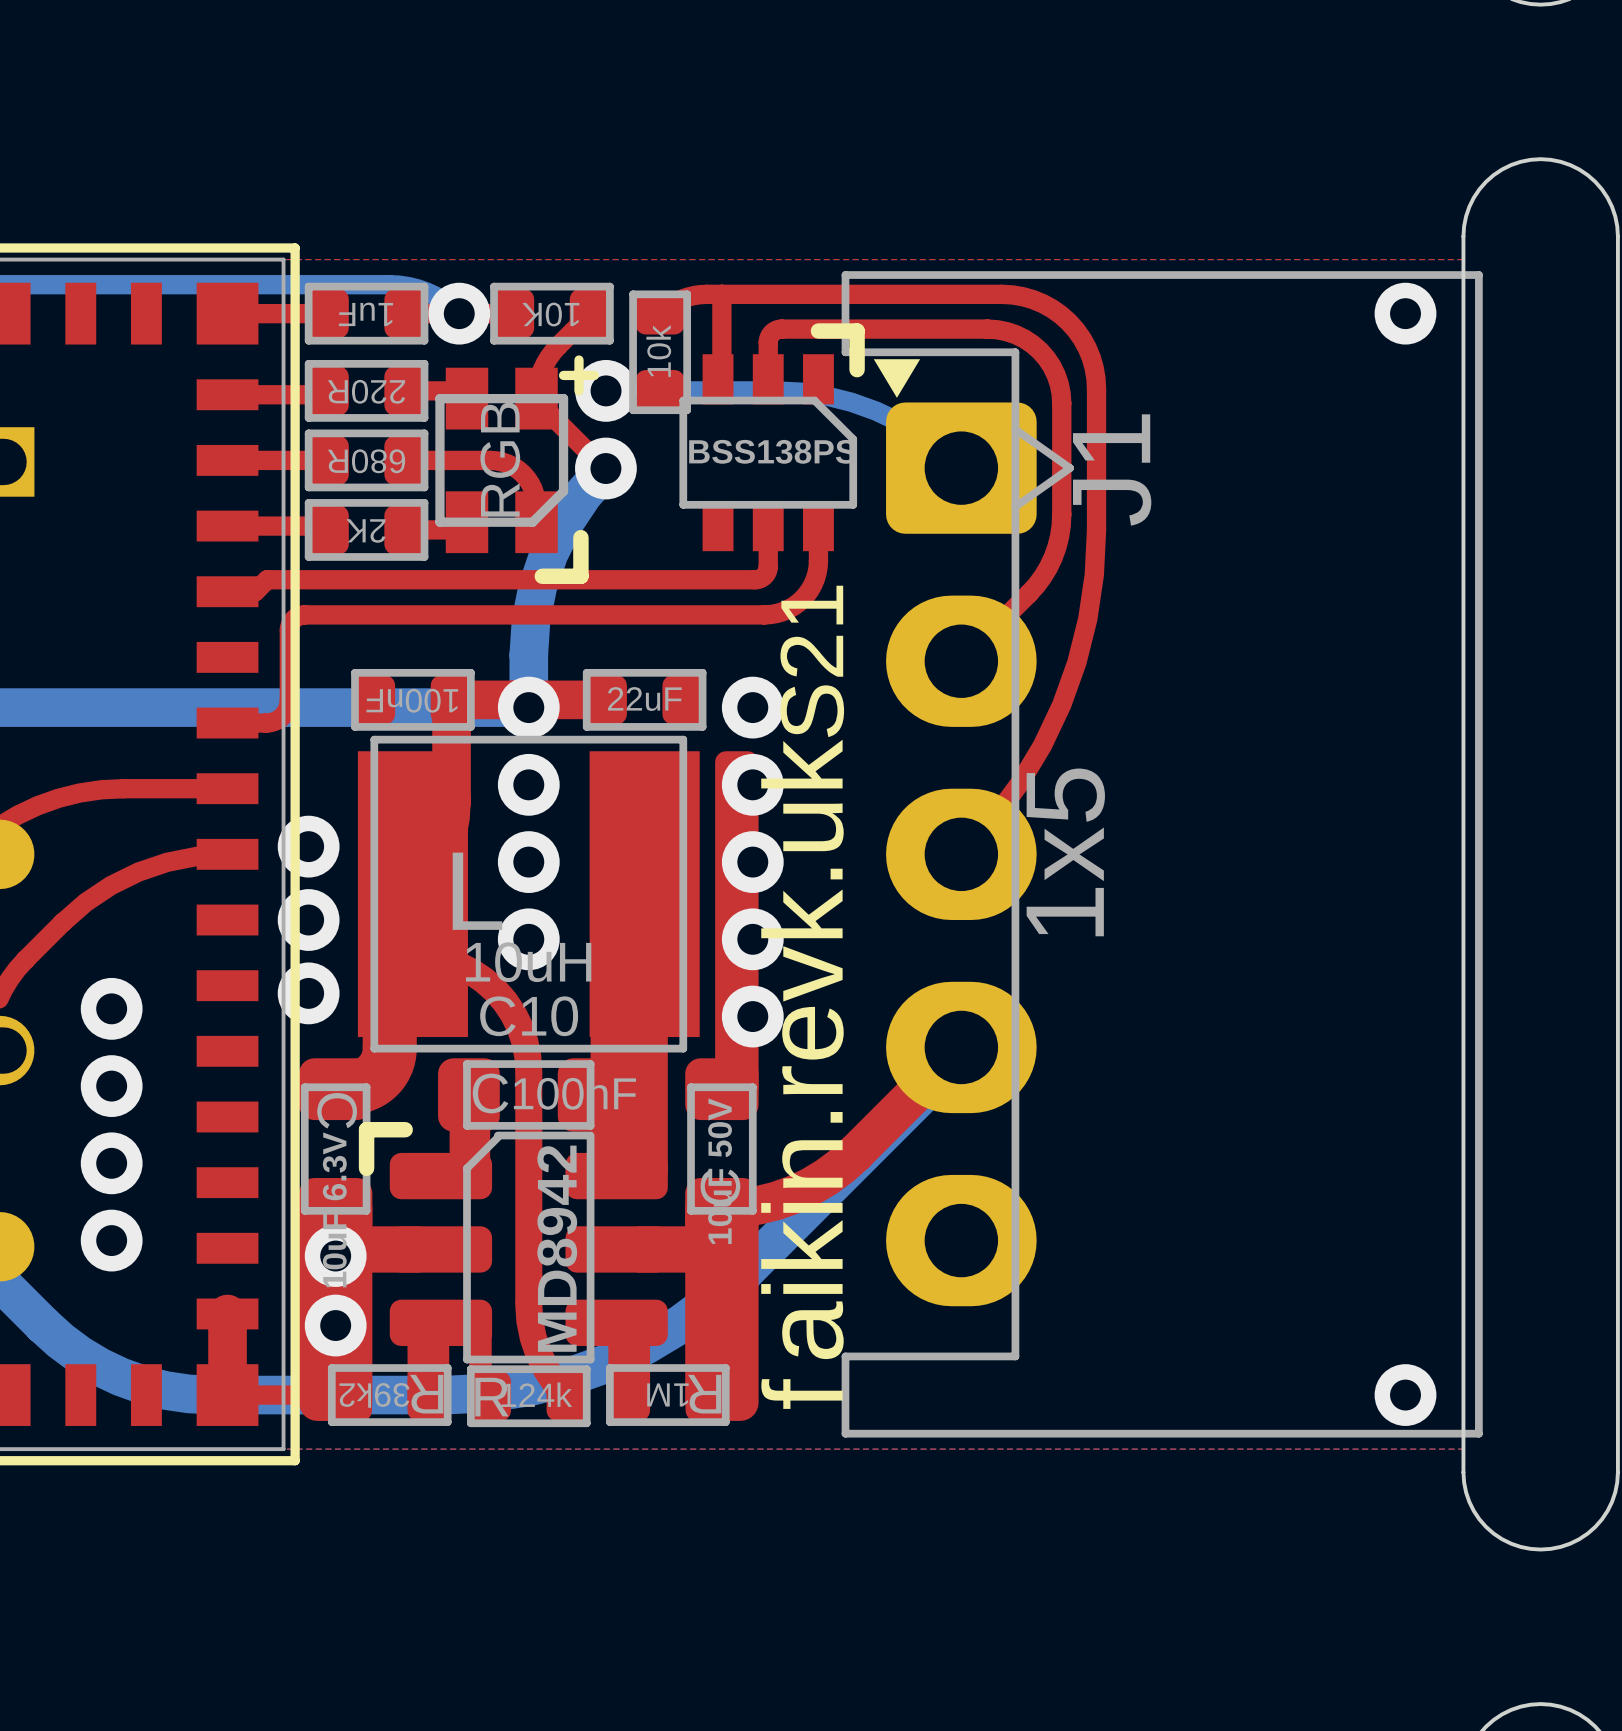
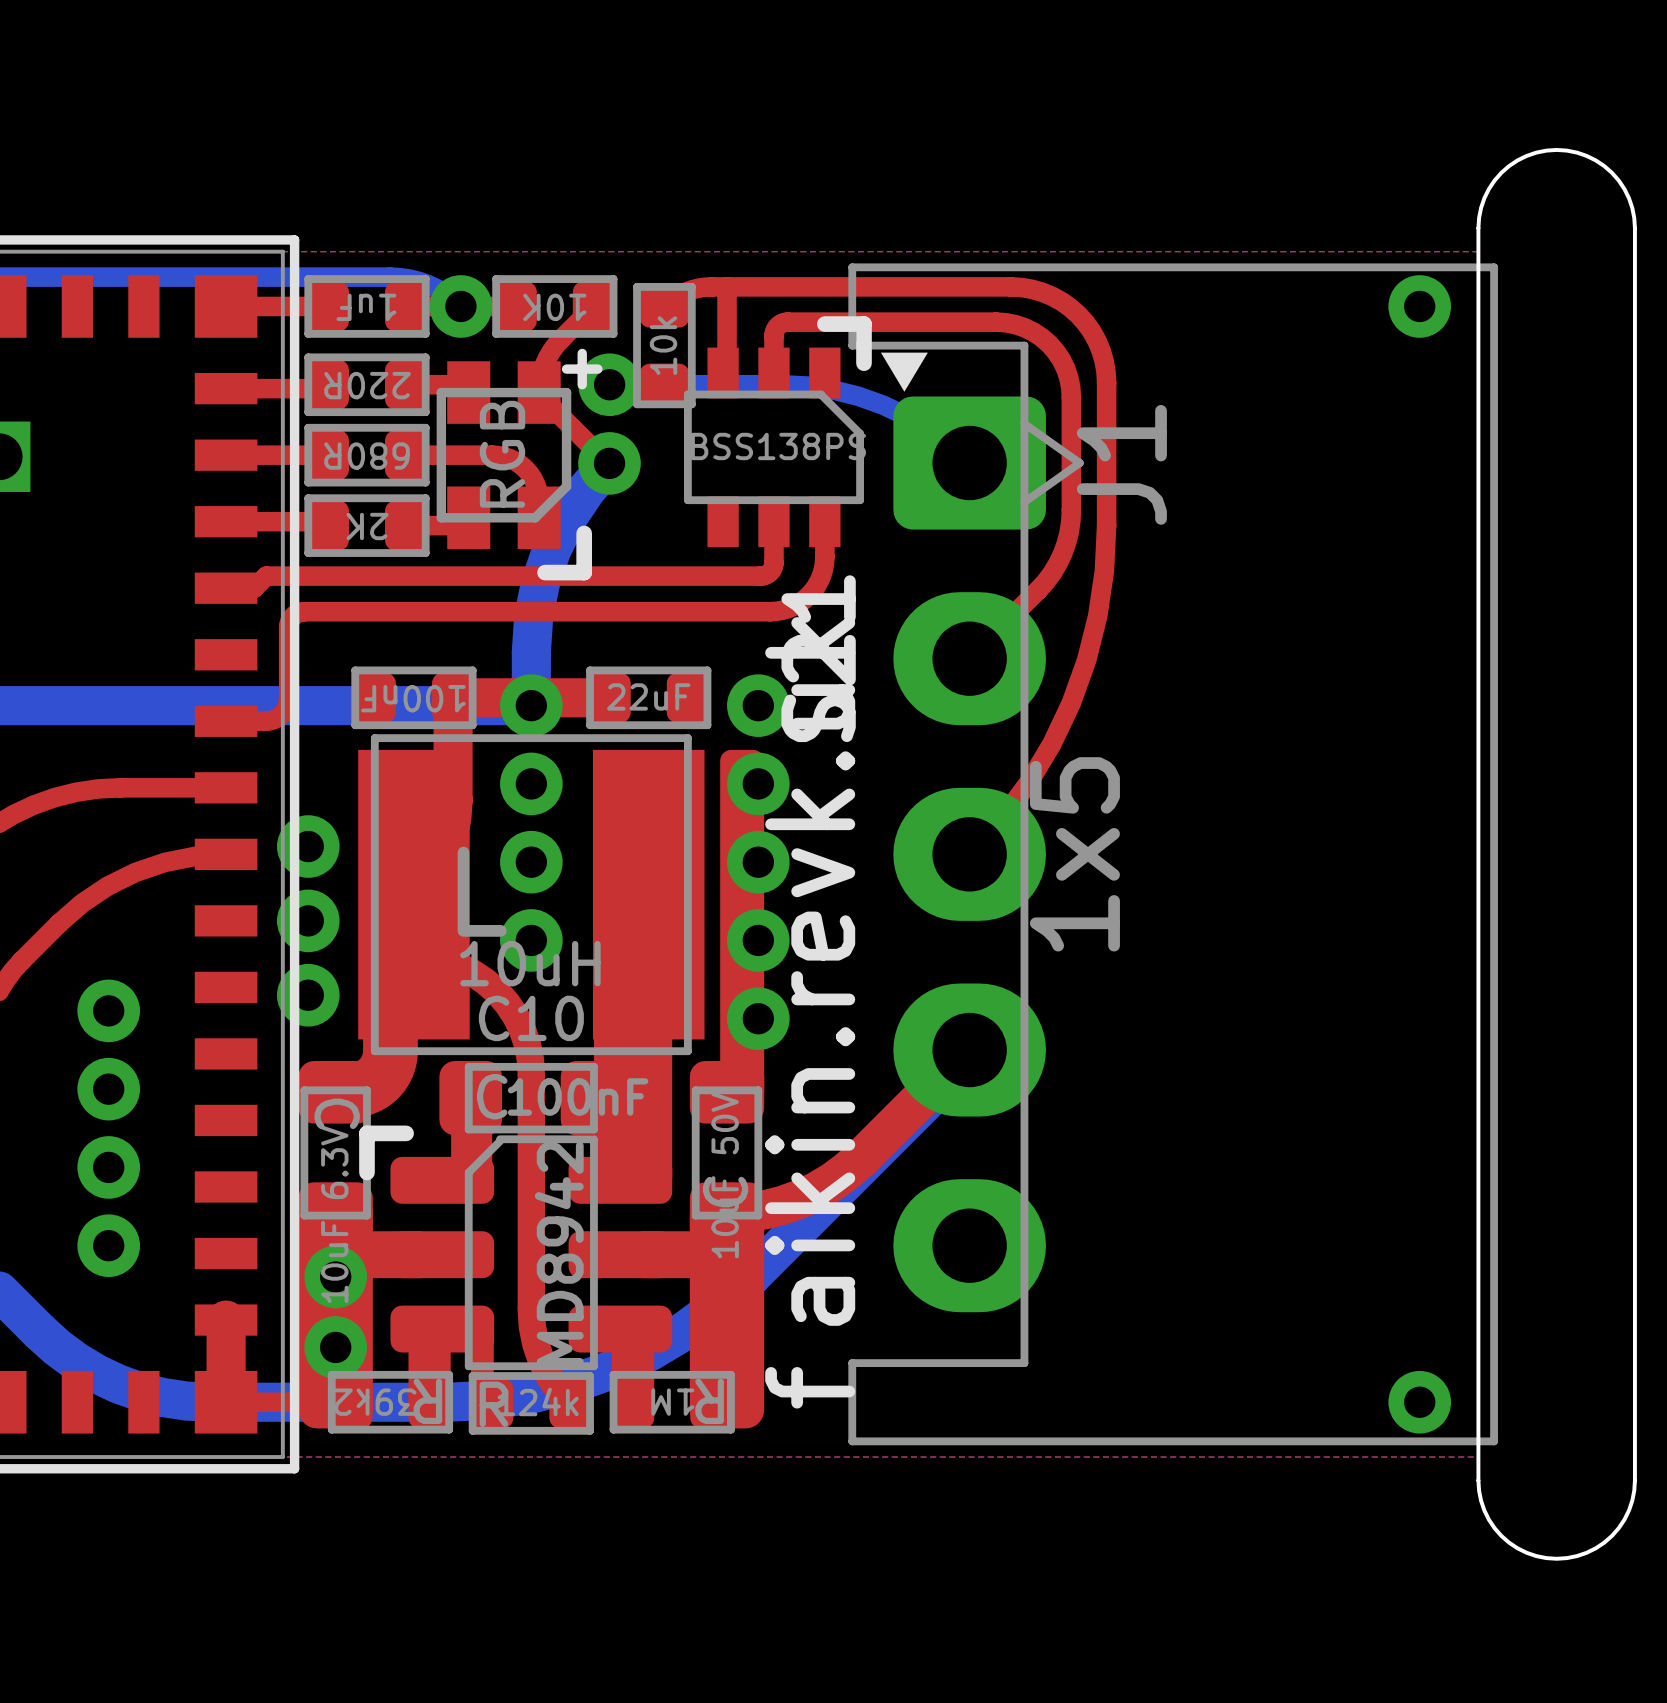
via position: (335, 1256) -> (335, 1277)
via position: (335, 1325) -> (335, 1347)

